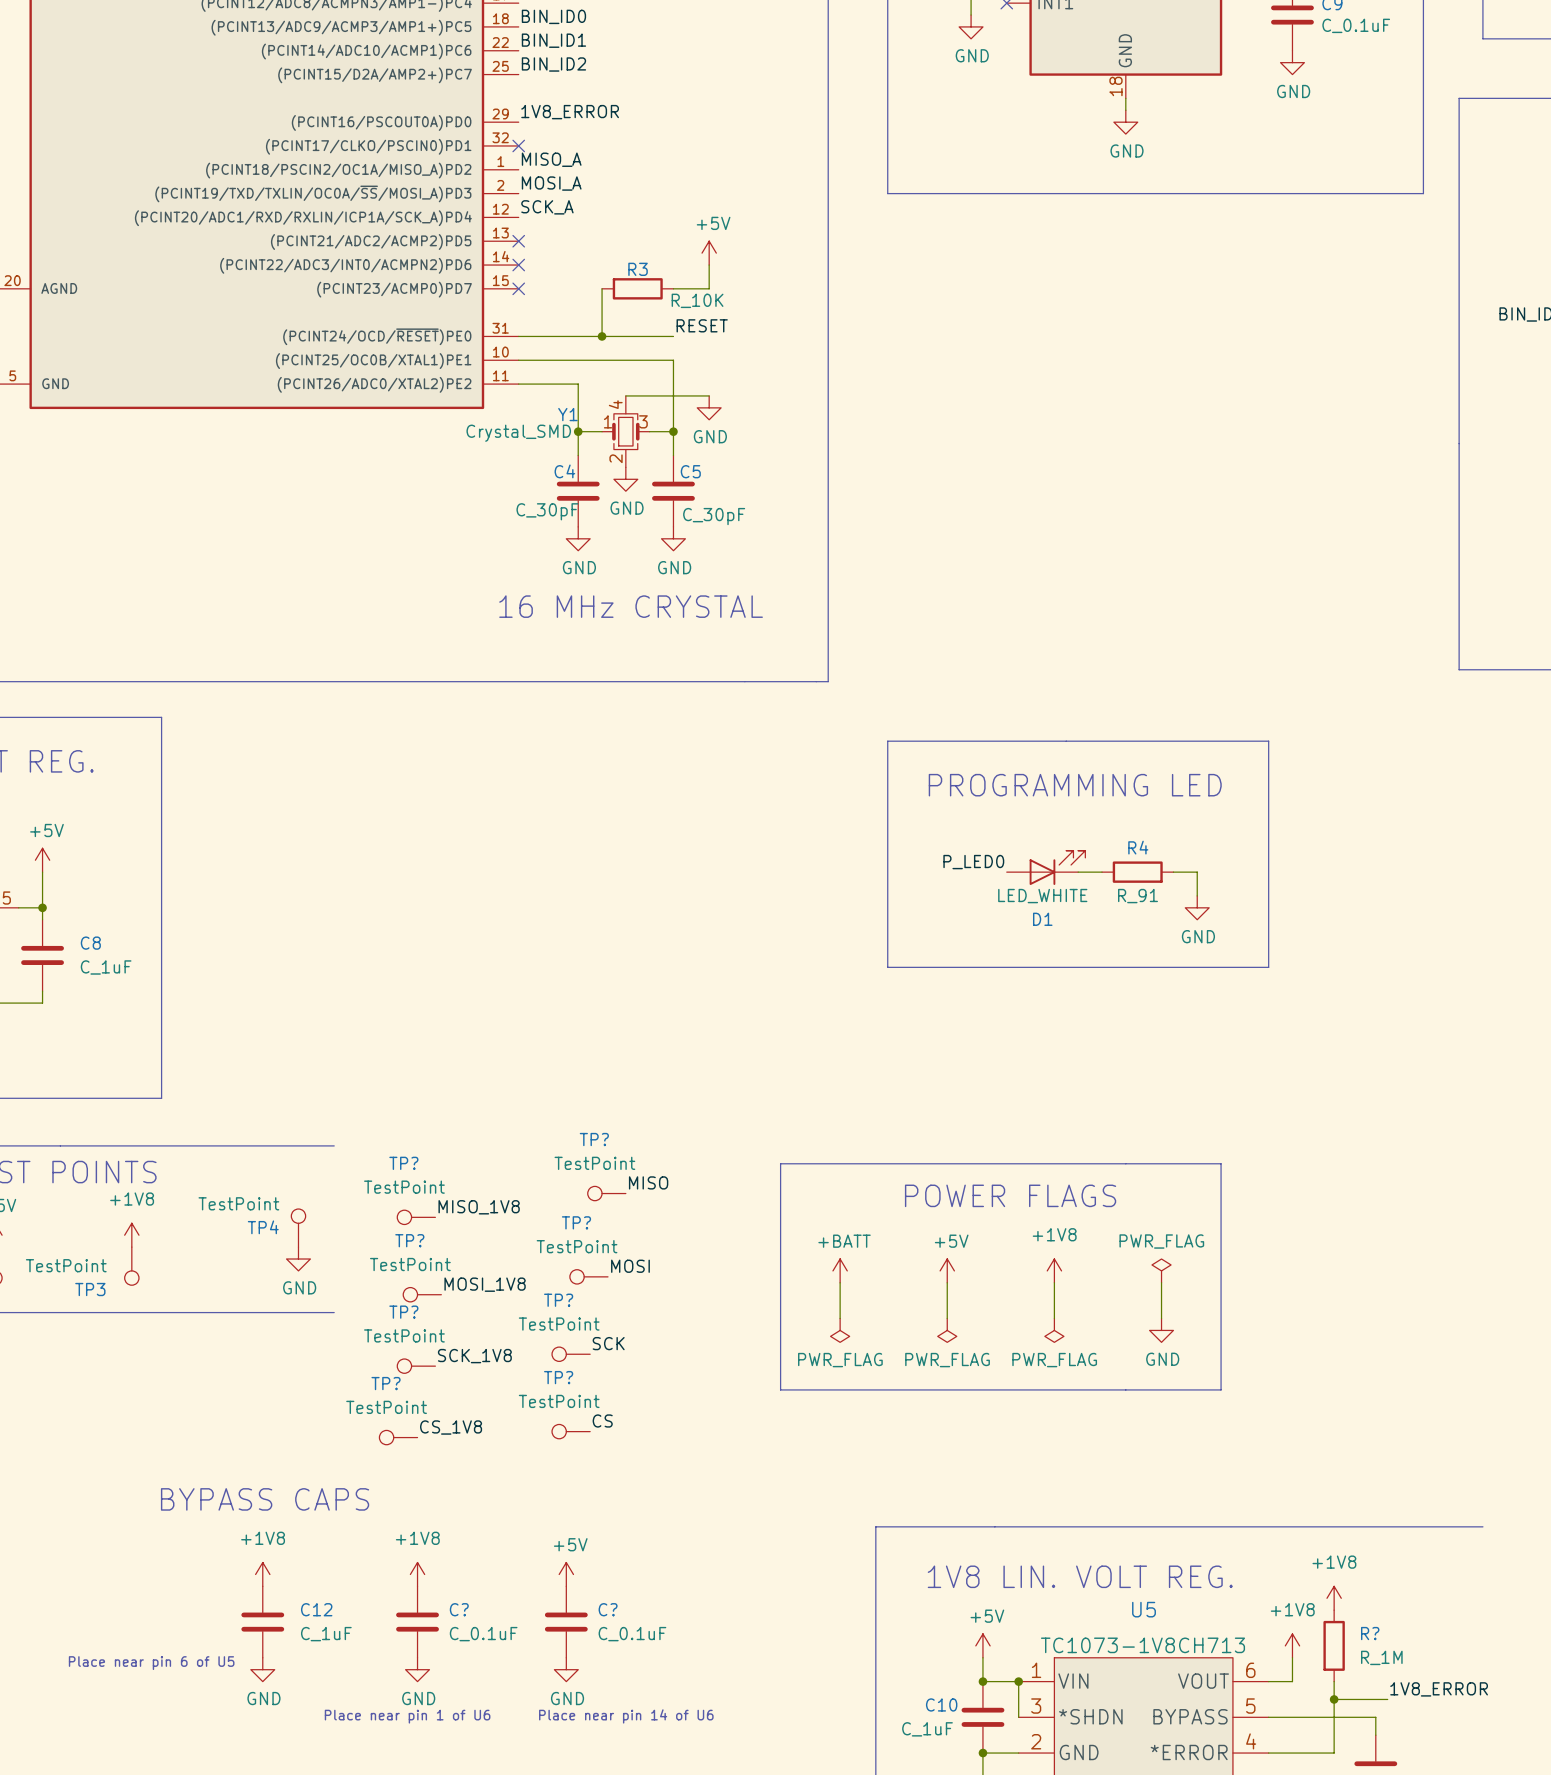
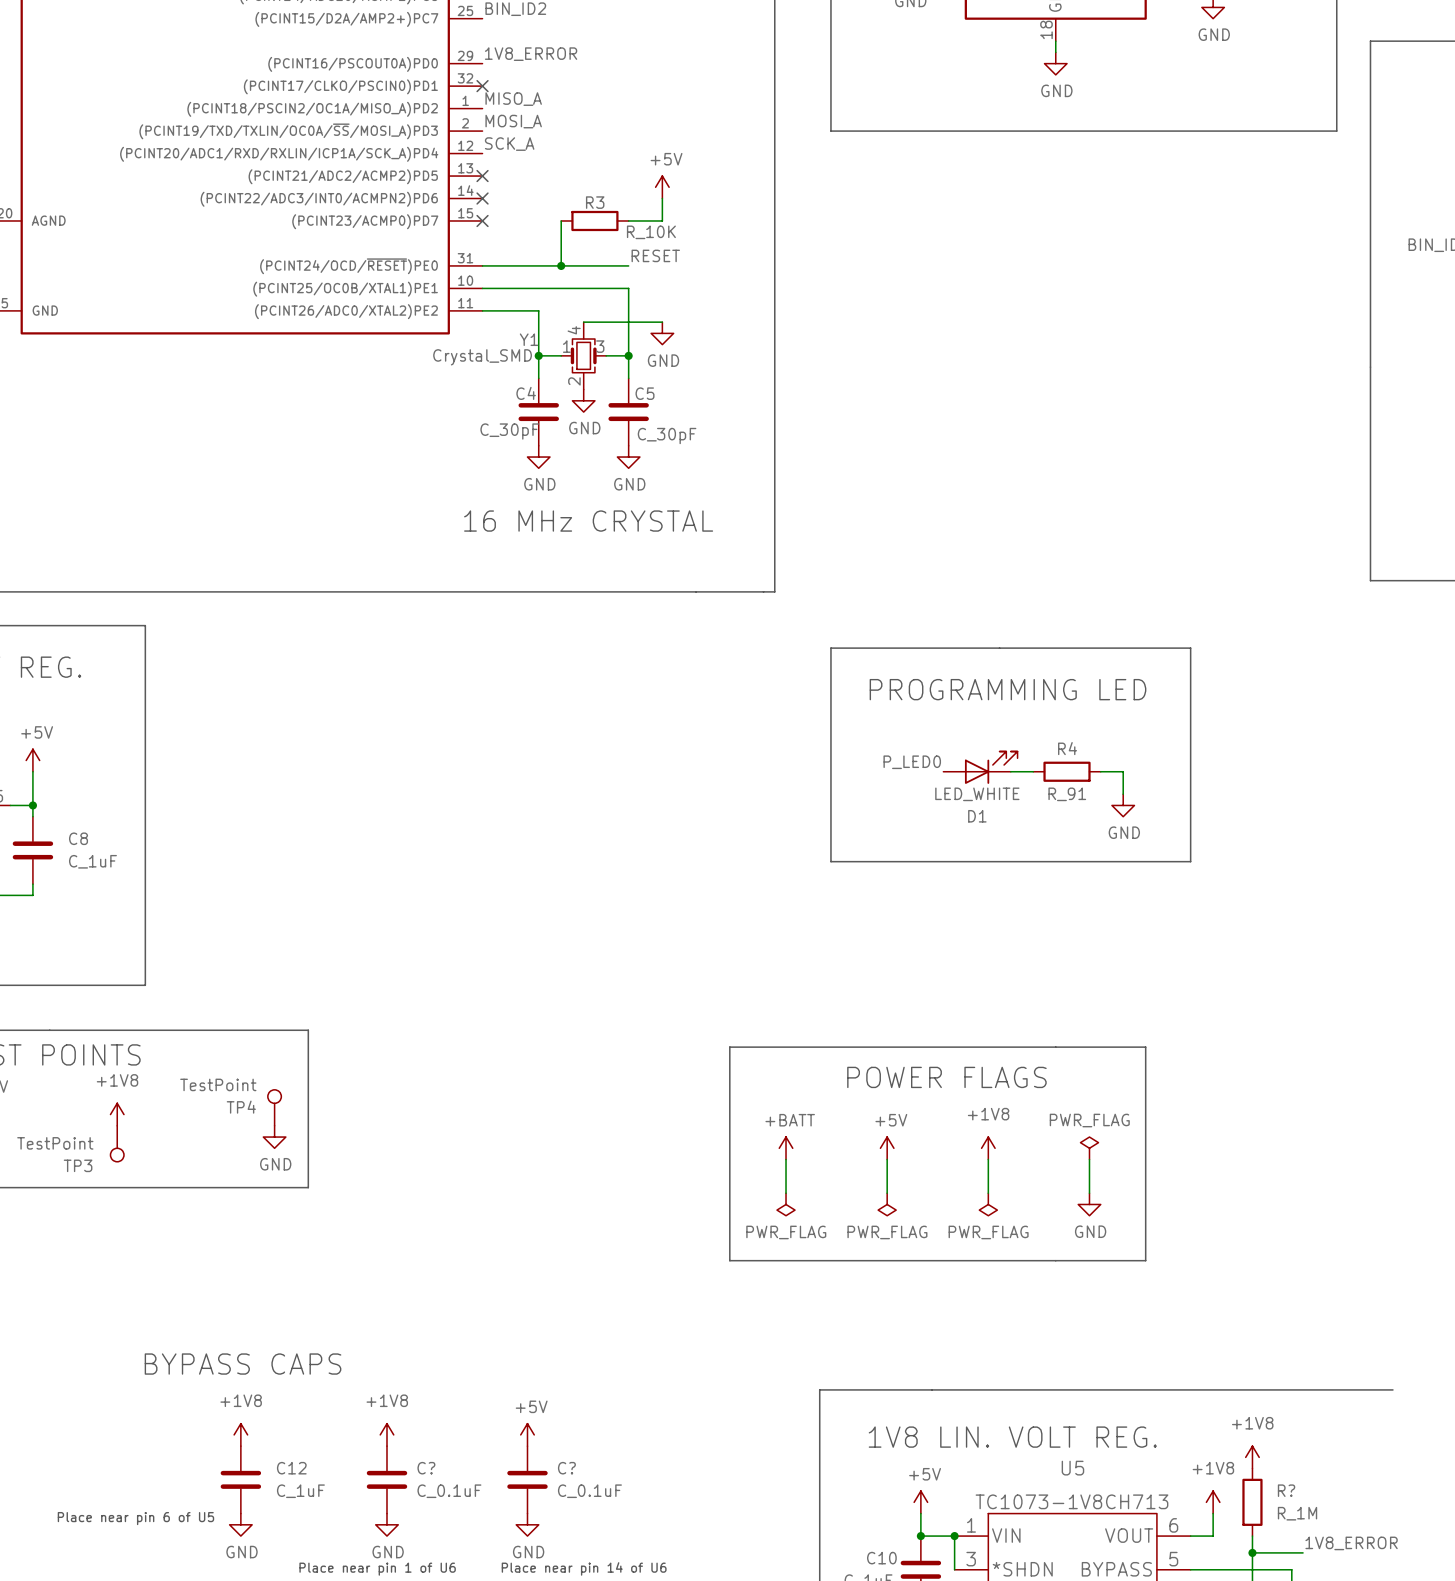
line: none -> (308, 1030) (308, 1187)
label: MISO (648, 1182) -> none
TP?: TestPoint (606, 1193) -> none
label: MISO_1V8 (479, 1207) -> none
TP?: TestPoint (416, 1217) -> none
label: MOSI (630, 1266) -> none
TP?: TestPoint (588, 1276) -> none
label: MOSI_1V8 (485, 1284) -> none
TP?: TestPoint (422, 1294) -> none
label: SCK (608, 1343) -> none
TP?: TestPoint (571, 1354) -> none
label: SCK_1V8 (474, 1356) -> none
TP?: TestPoint (416, 1366) -> none
label: CS (602, 1420) -> none
label: CS_1V8 (451, 1427) -> none
TP?: TestPoint (571, 1431) -> none
TP?: TestPoint (398, 1437) -> none

